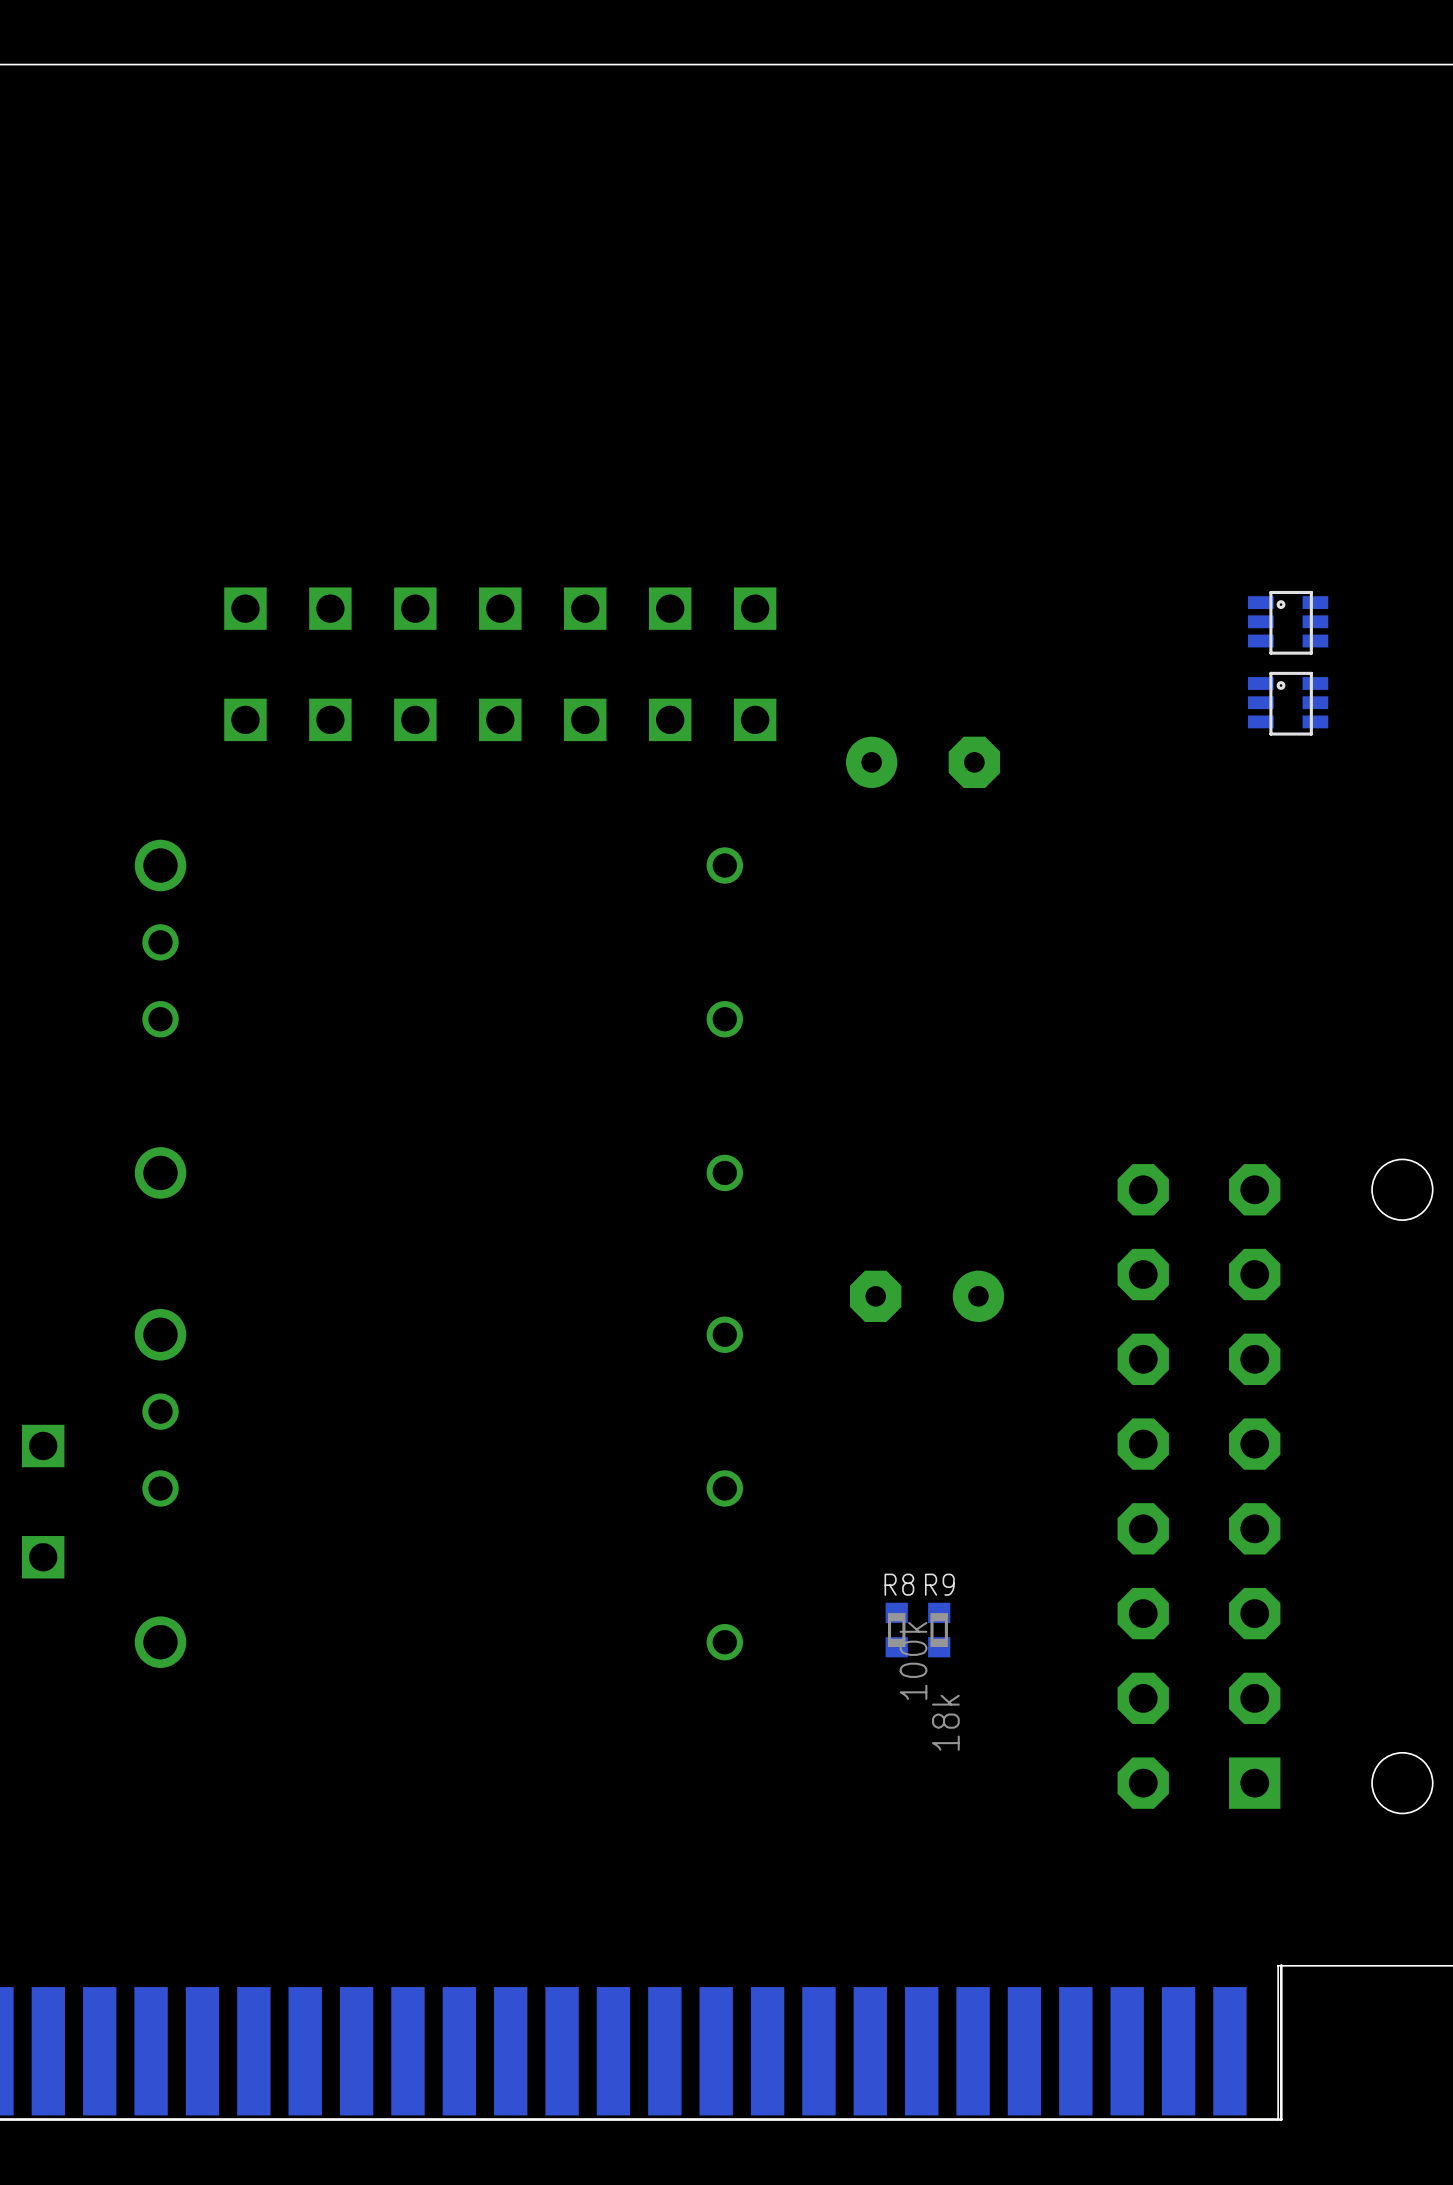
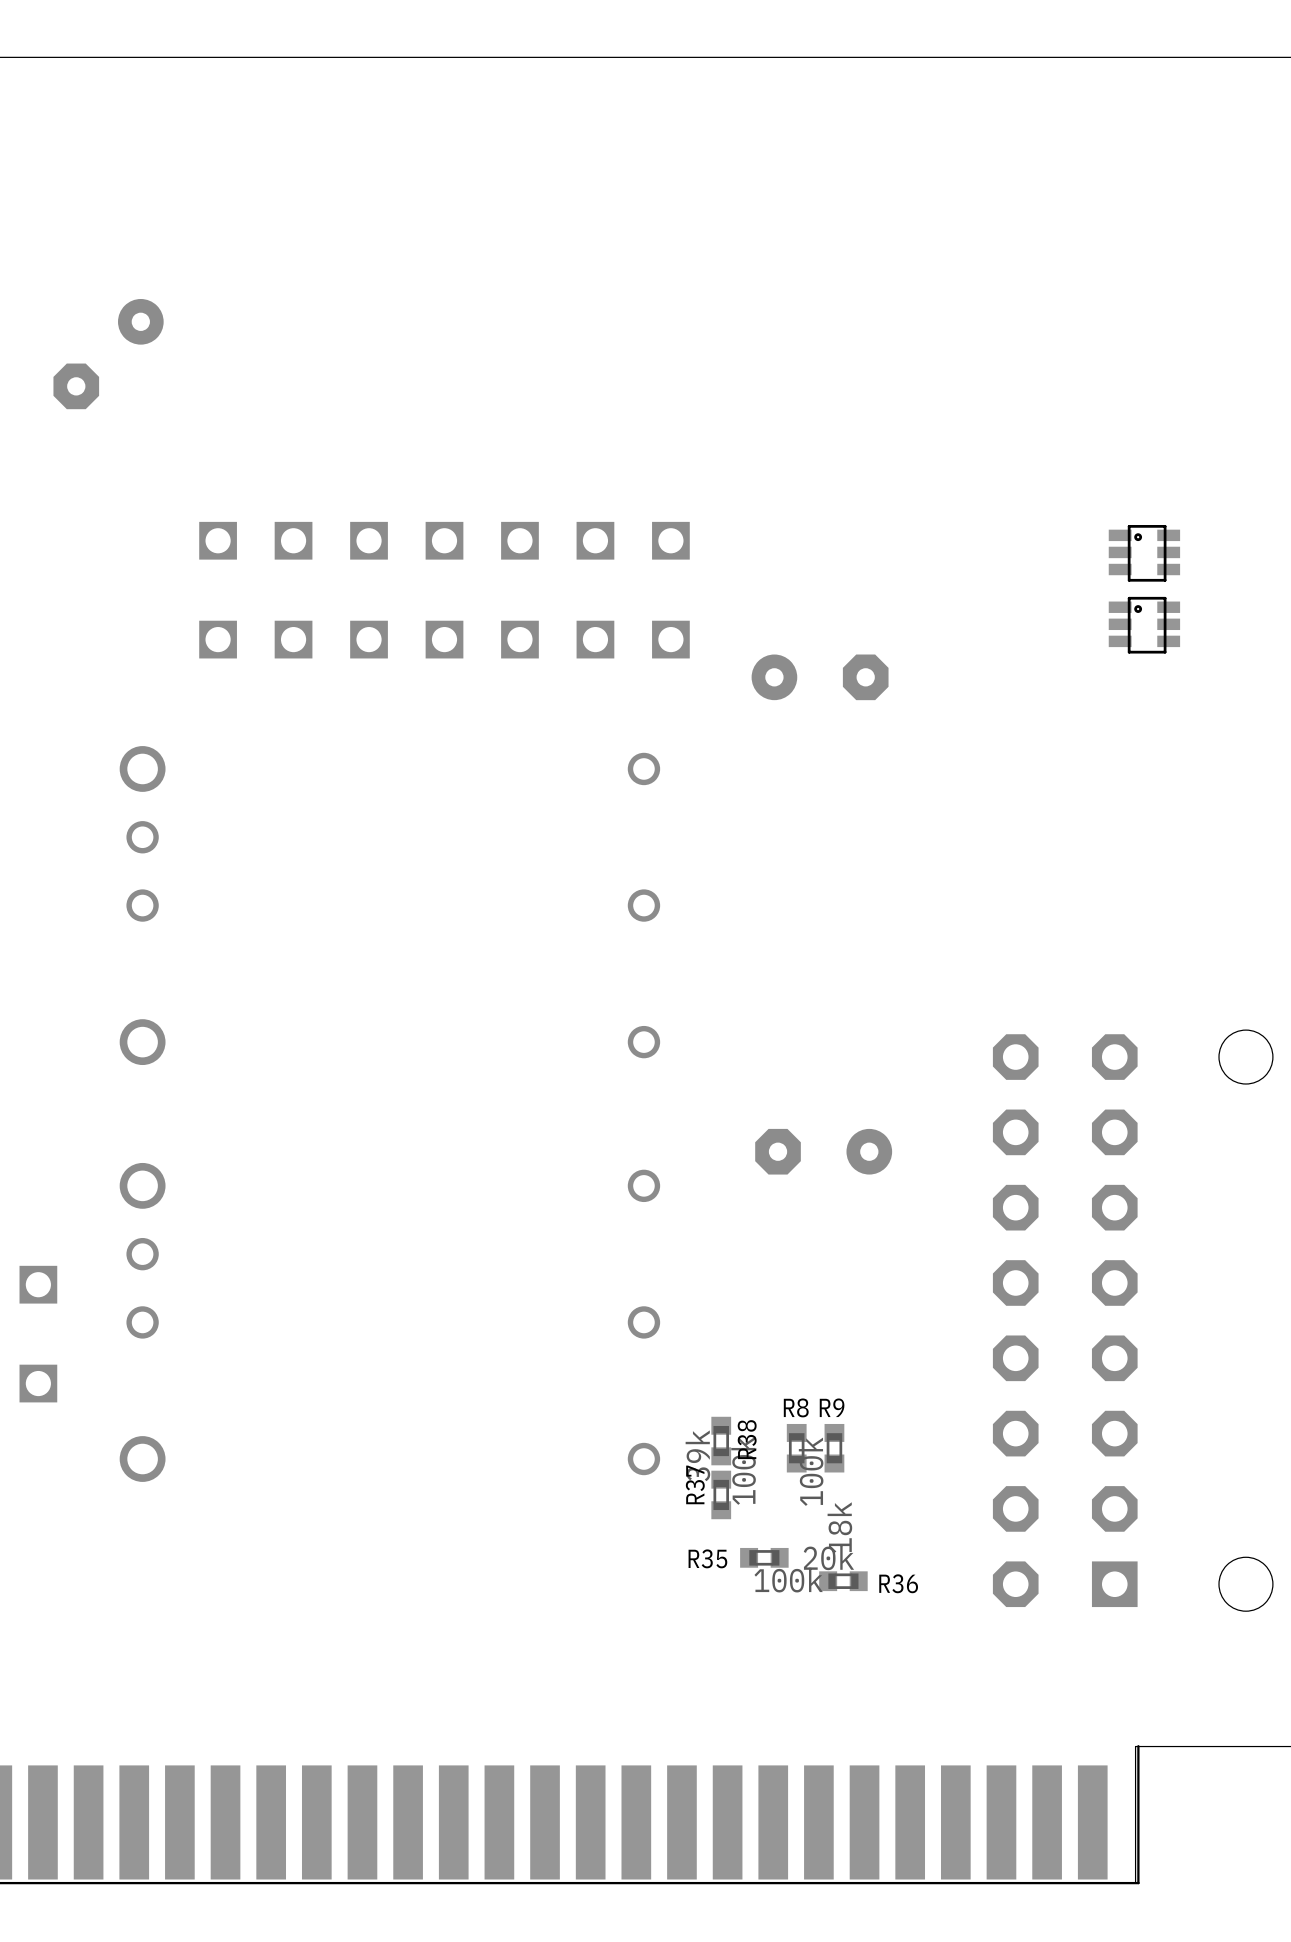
part: none -> (108, 354)
R38: none -> 39k (721, 1441)
R37: none -> 100k (721, 1494)
R35: none -> 100k (764, 1557)
R36: none -> 20k (843, 1581)

